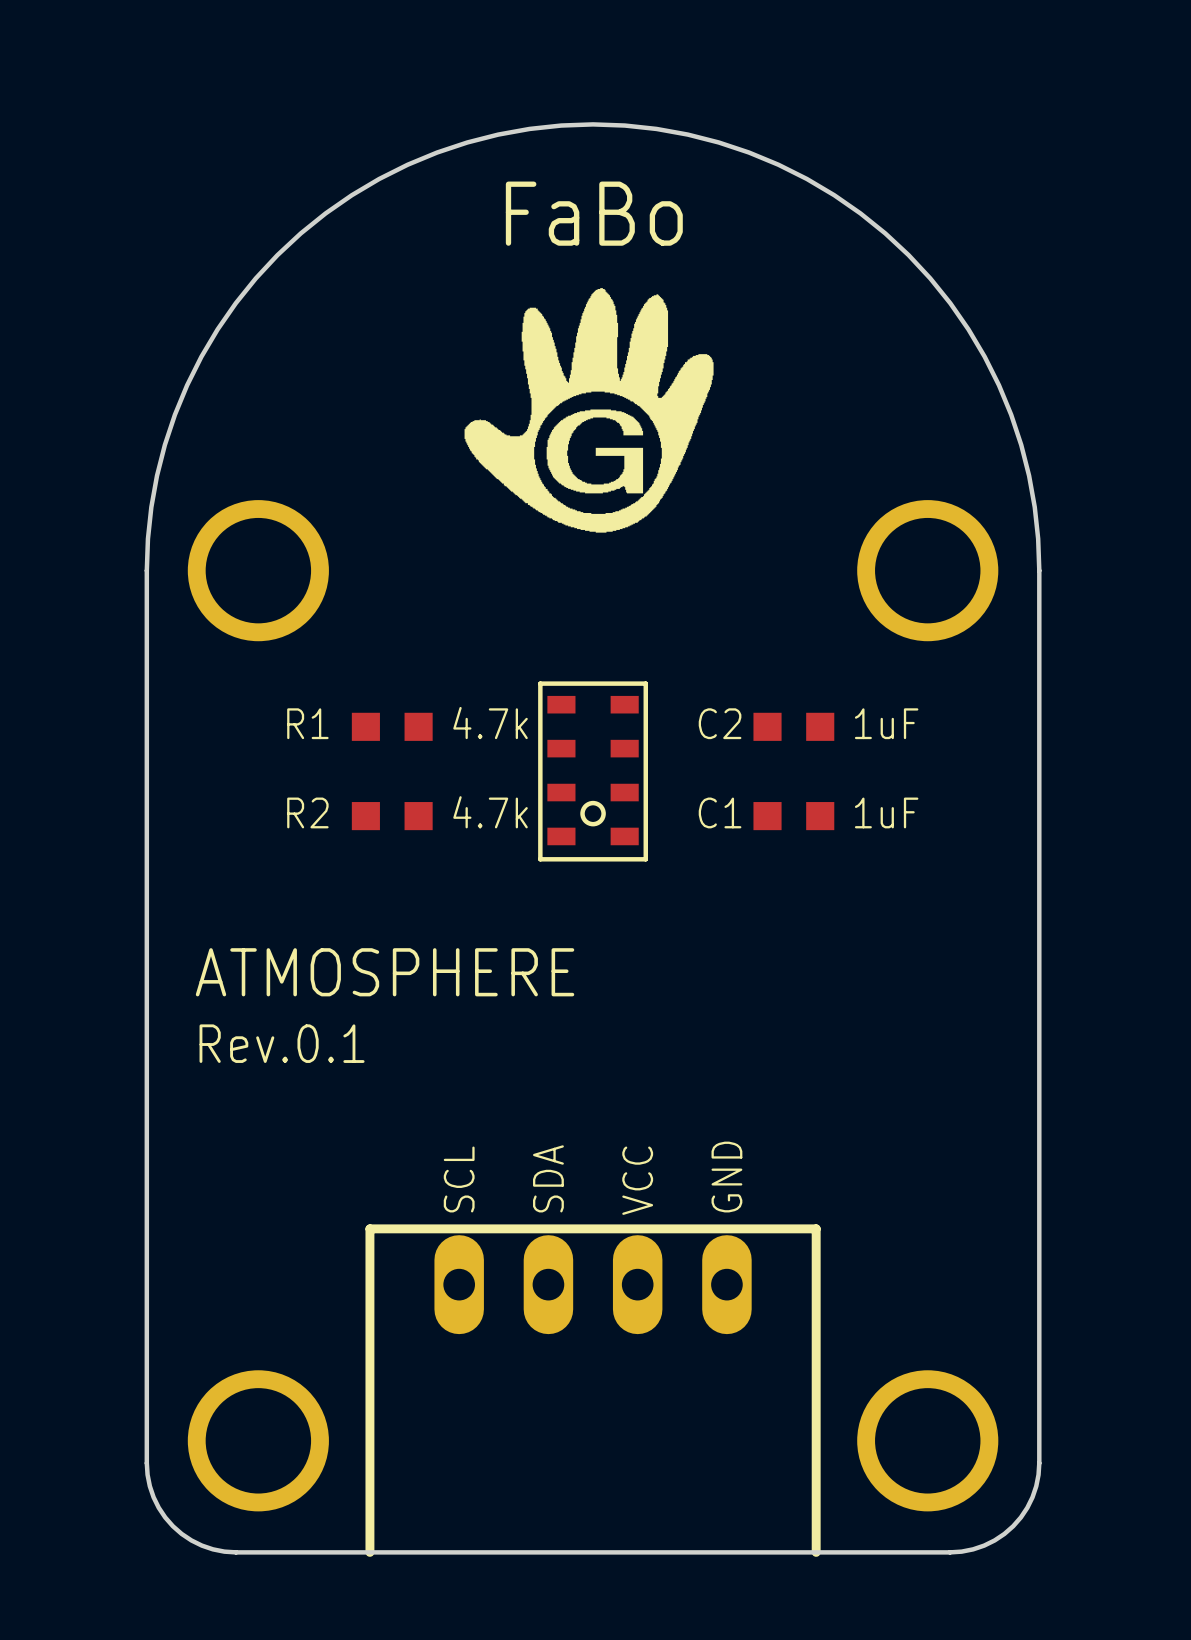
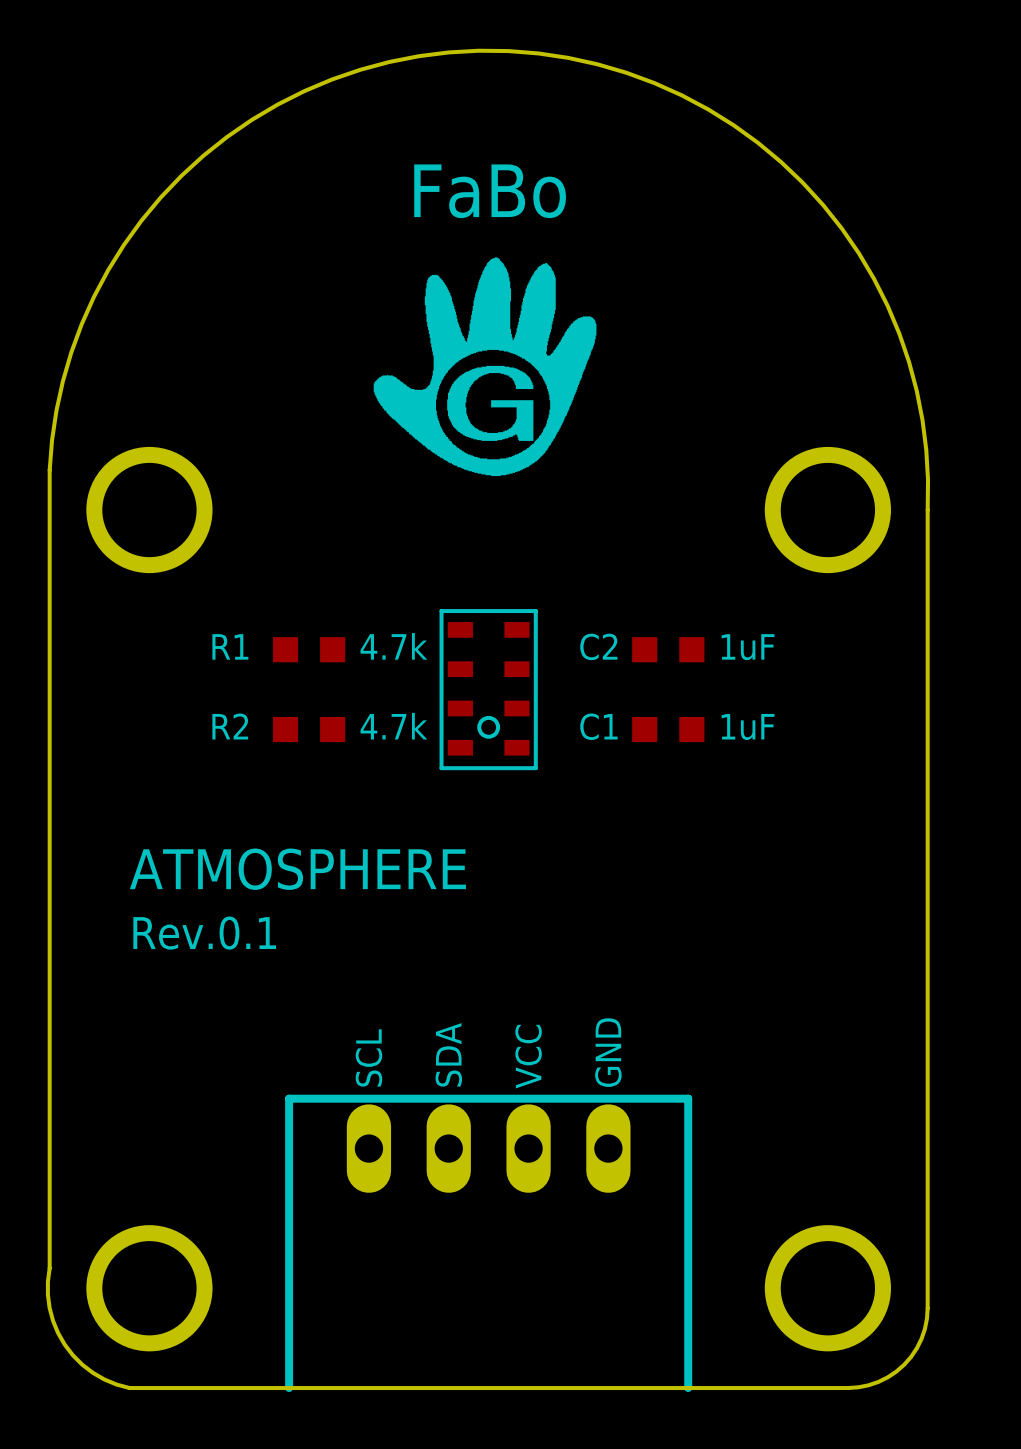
part footprint: [144, 122, 1042, 1557] -> [45, 48, 931, 1393]

